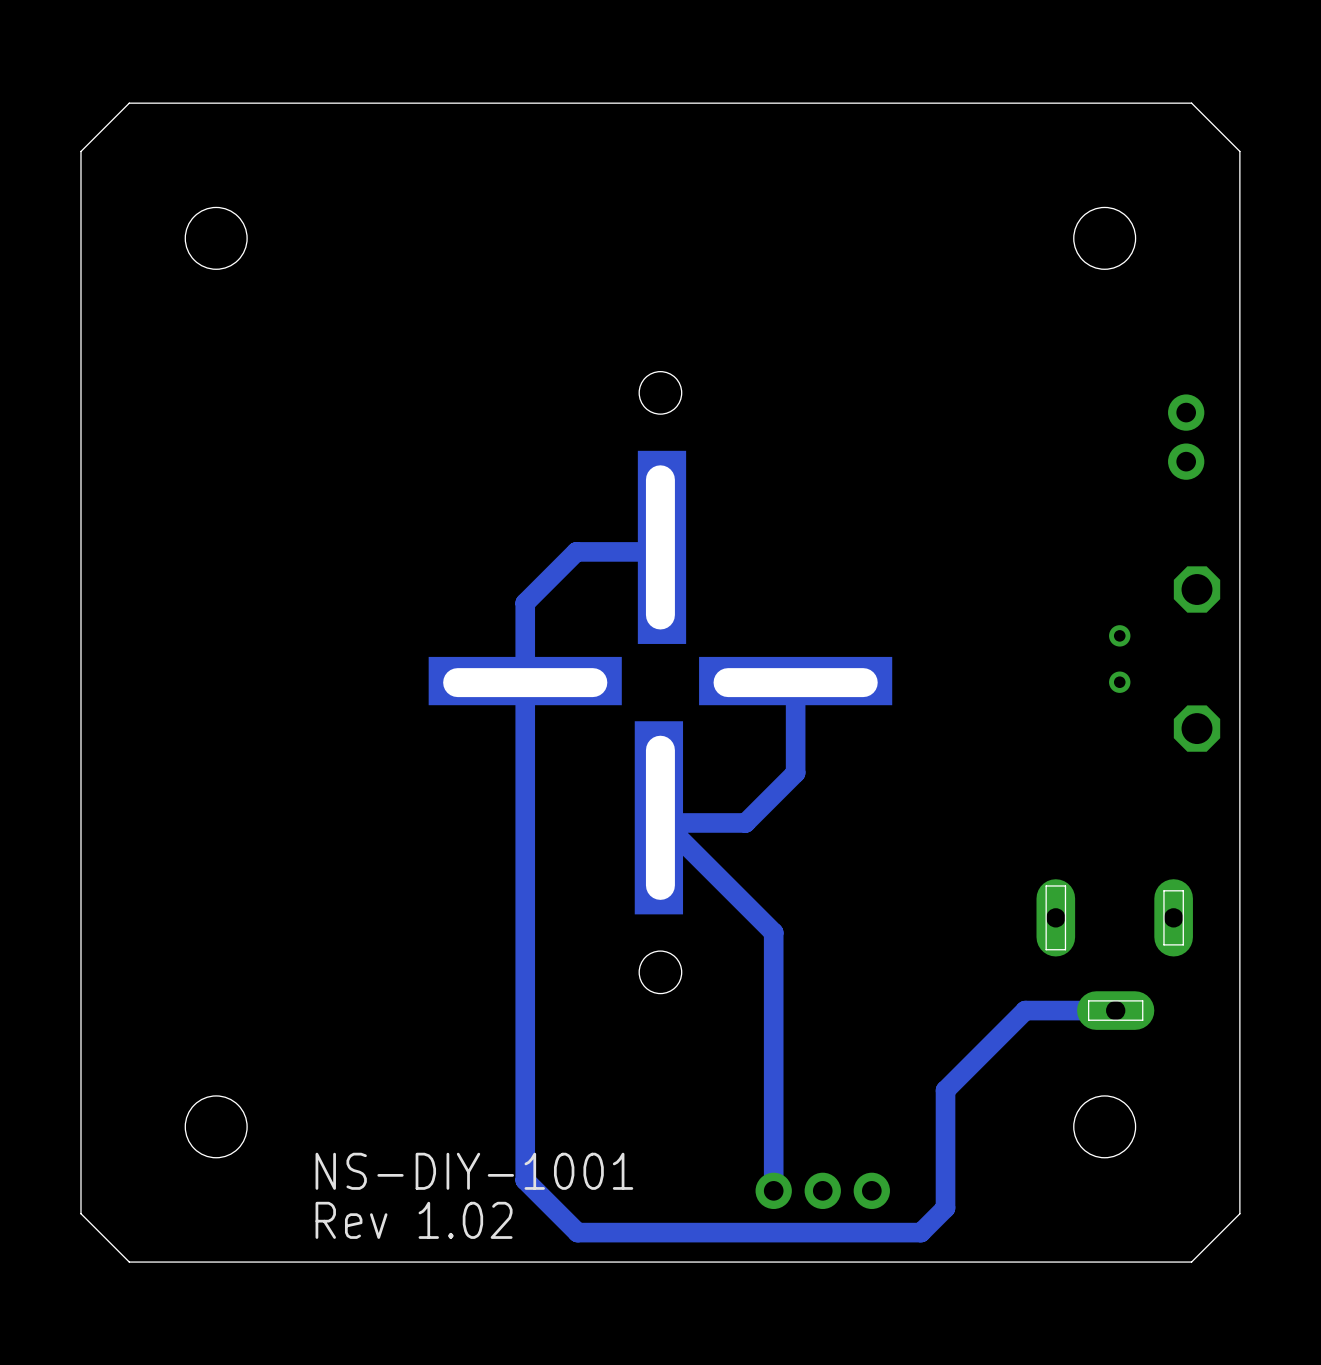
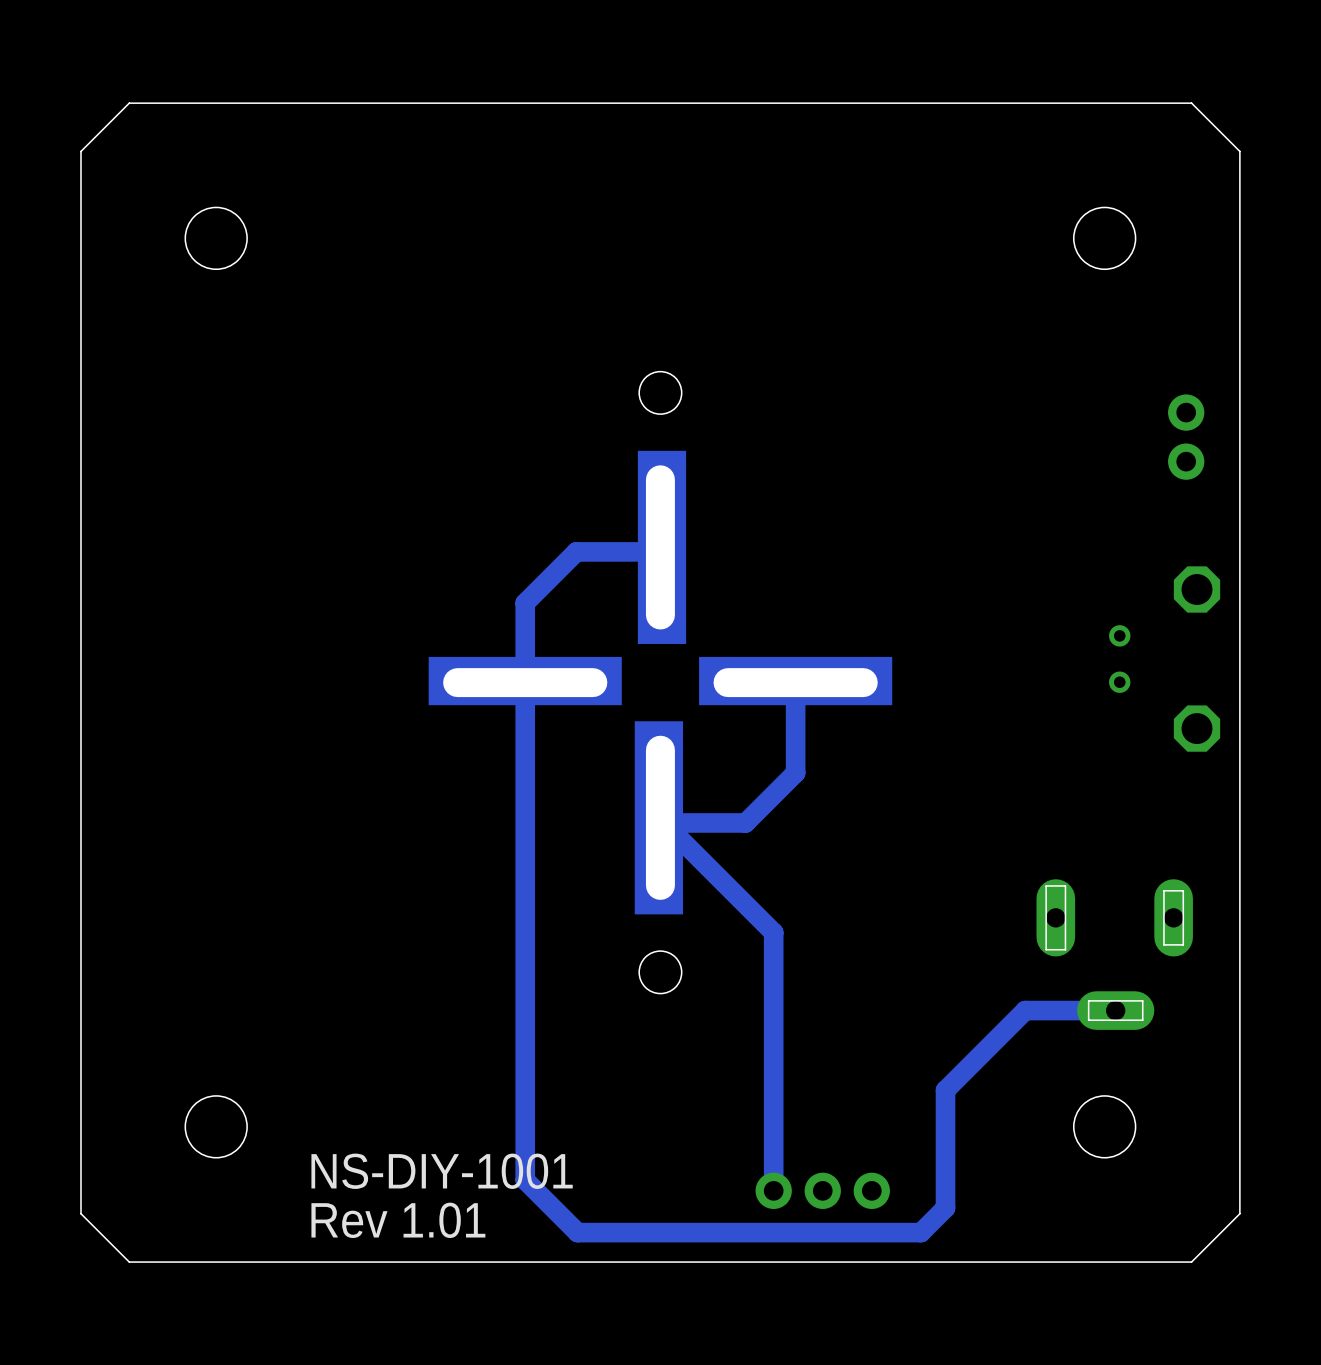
text: Rev 1.02 (414, 1220) -> Rev 1.01 (398, 1220)

